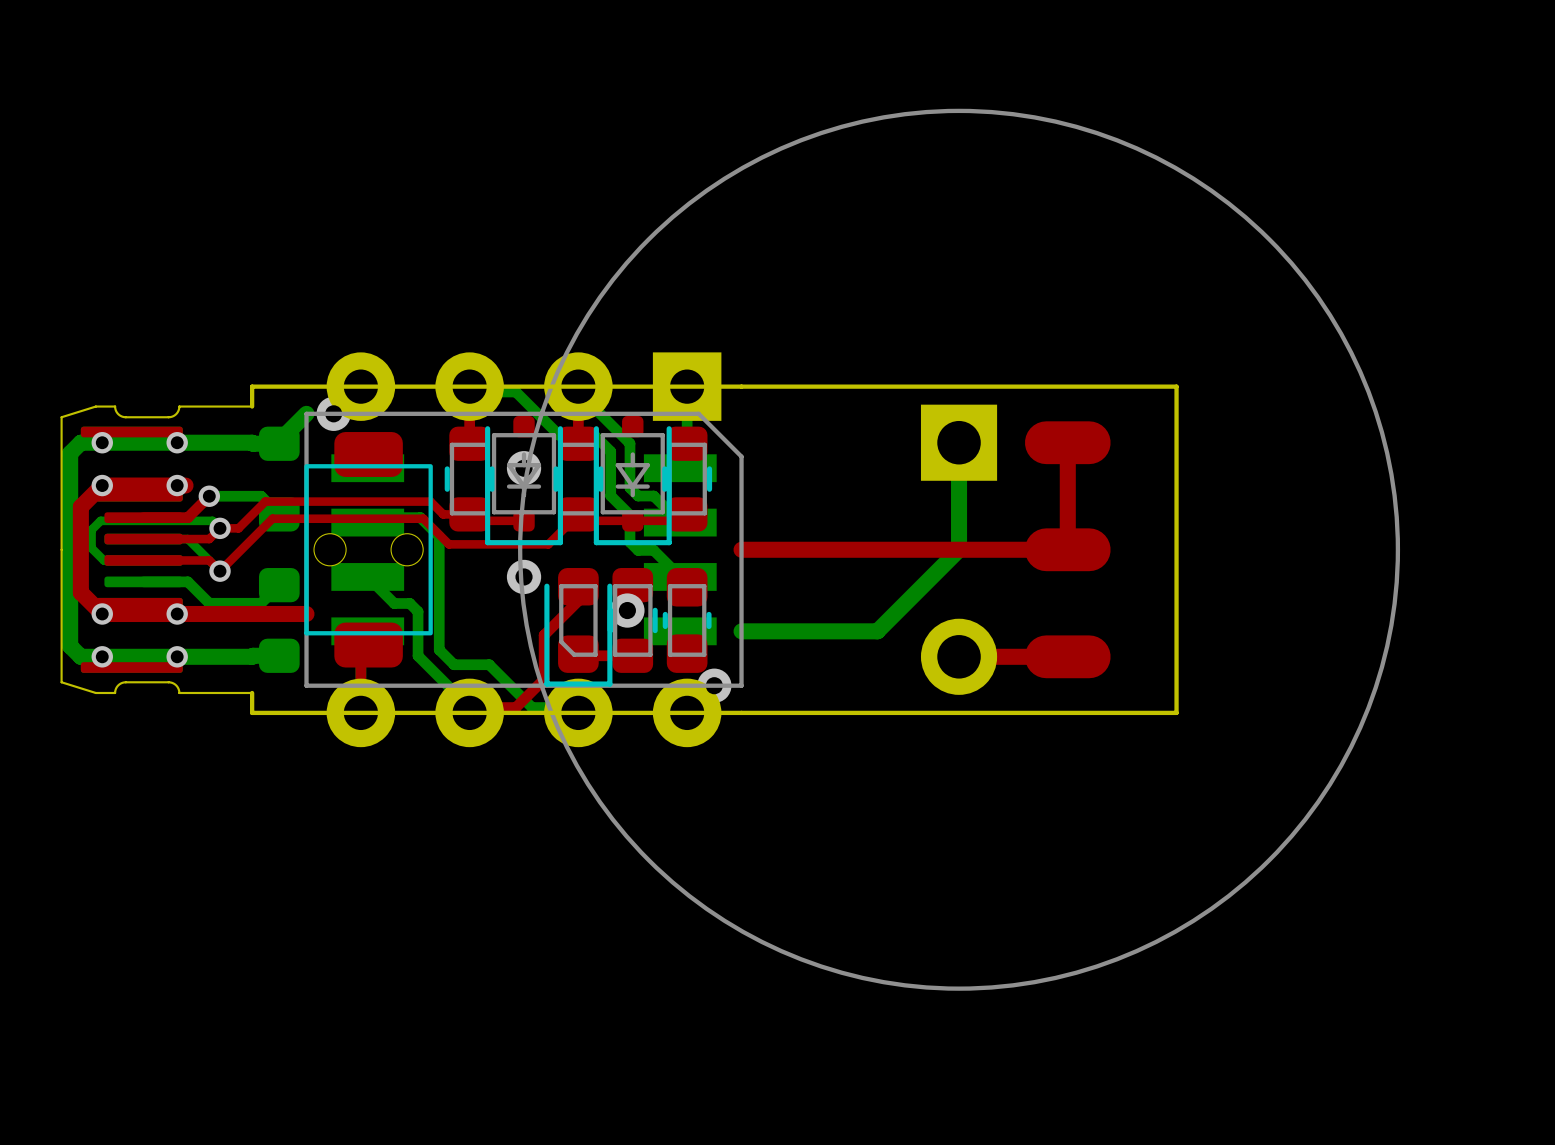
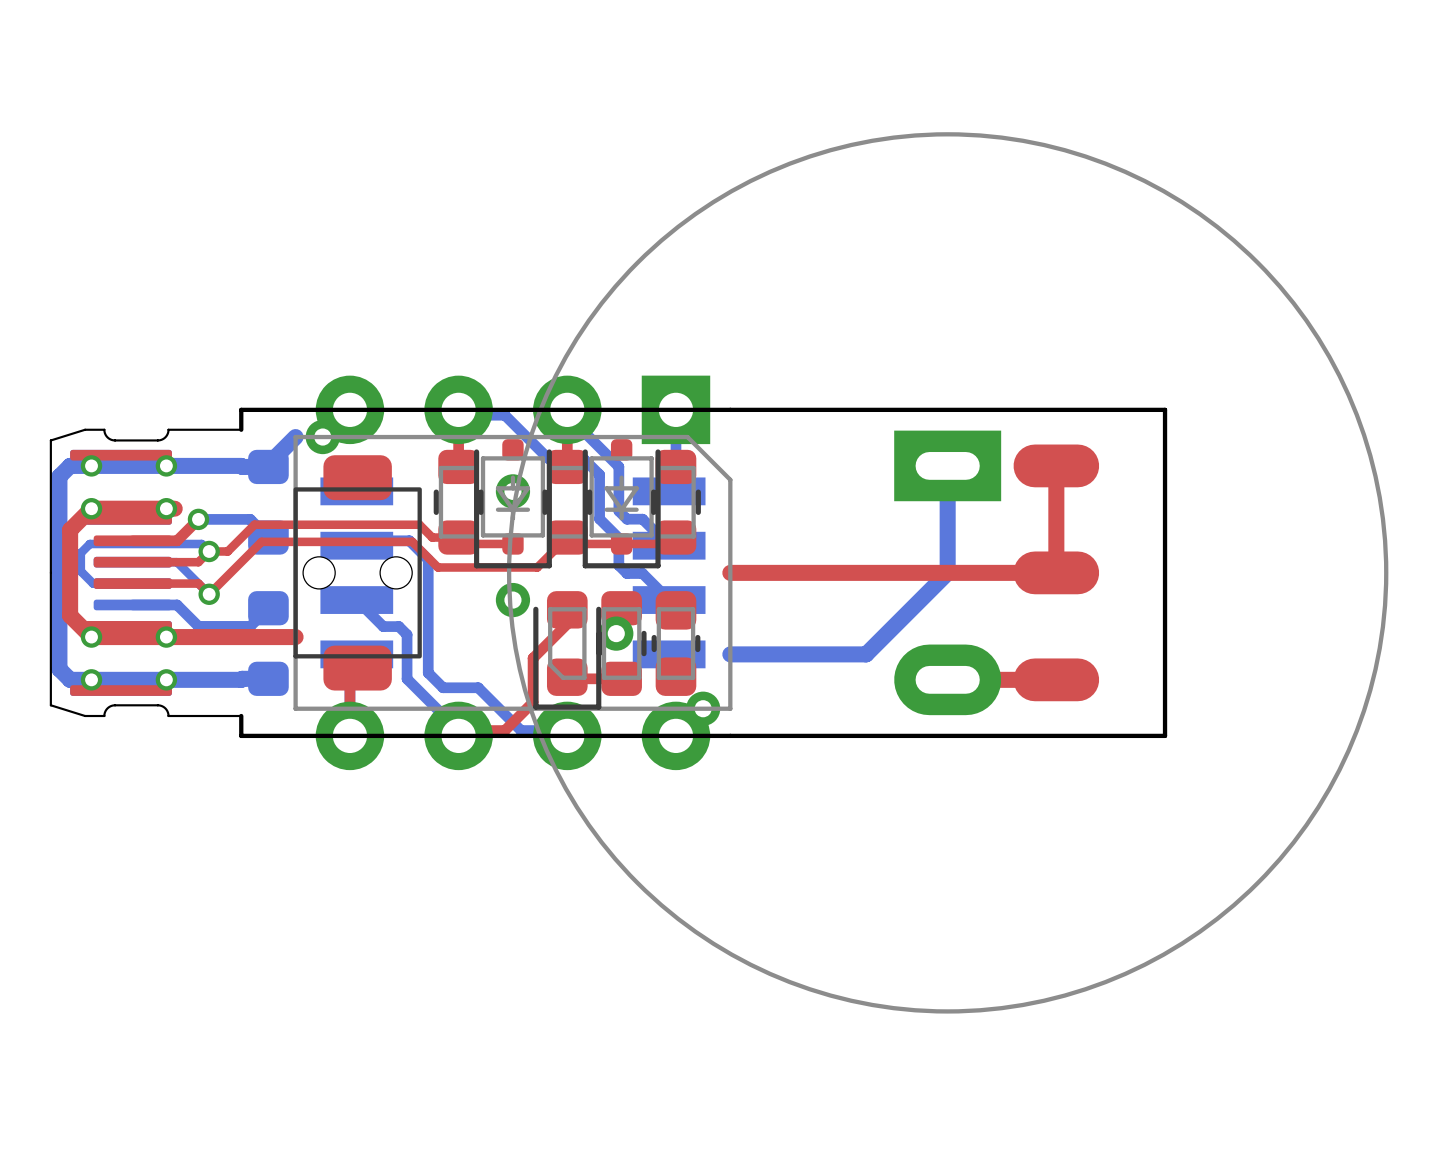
part footprint: [518, 108, 1401, 991] -> [506, 132, 1389, 1014]

